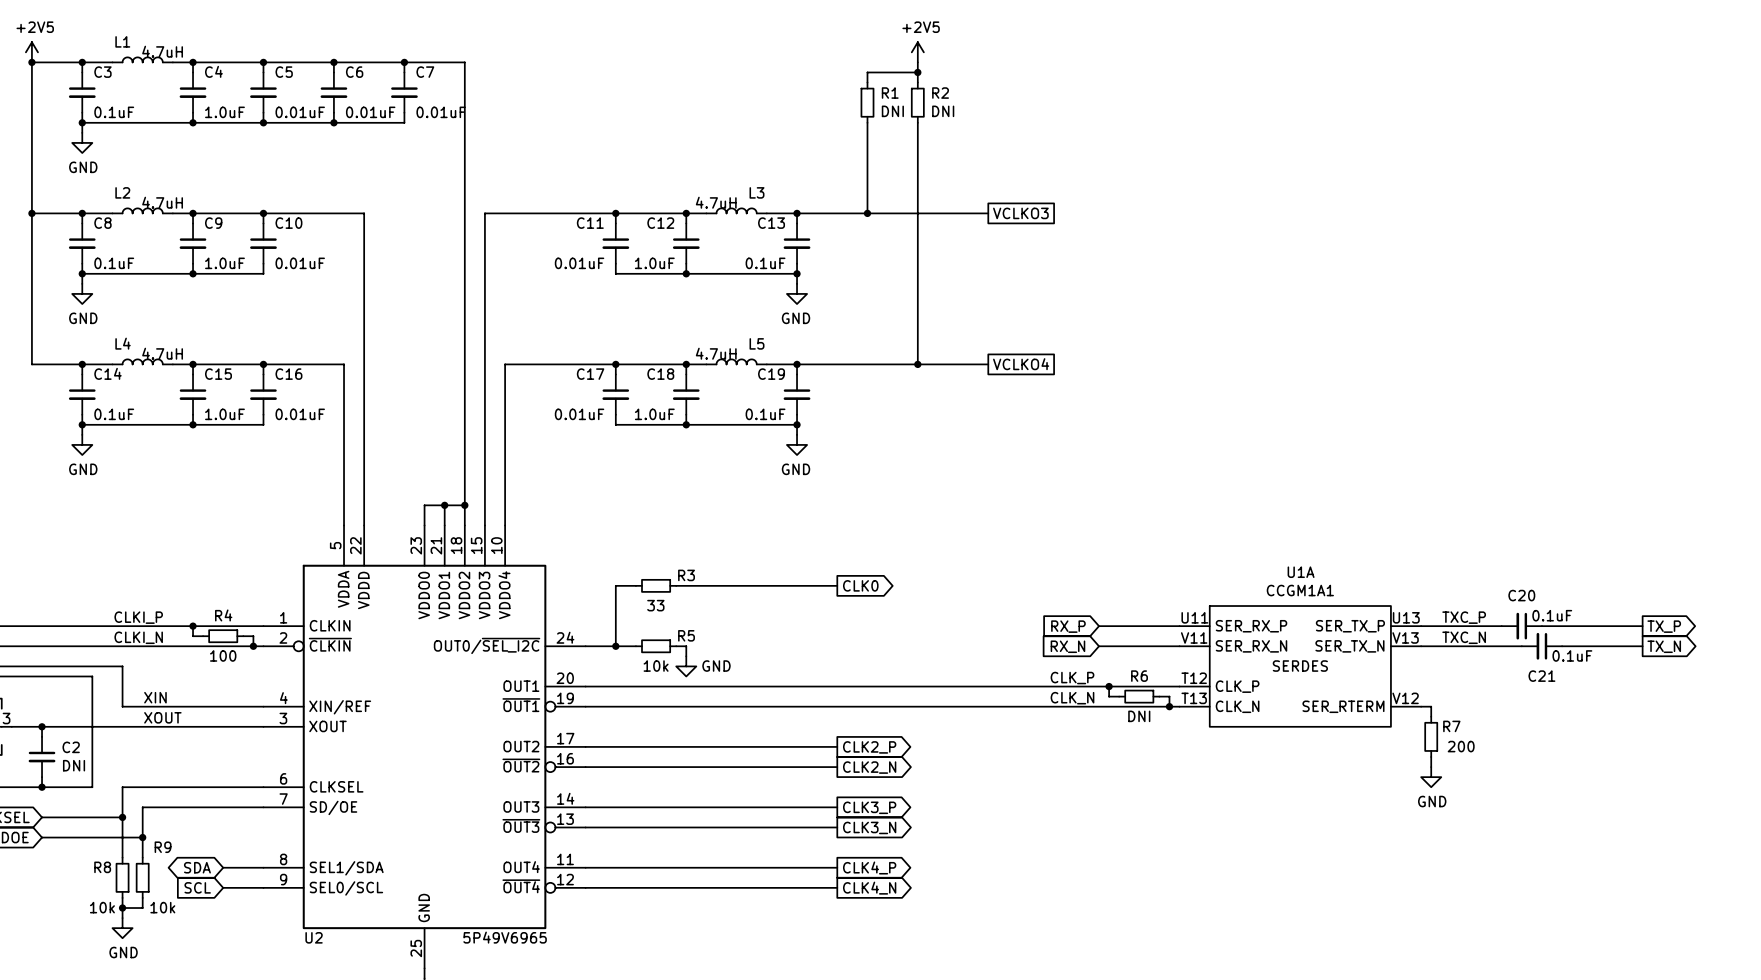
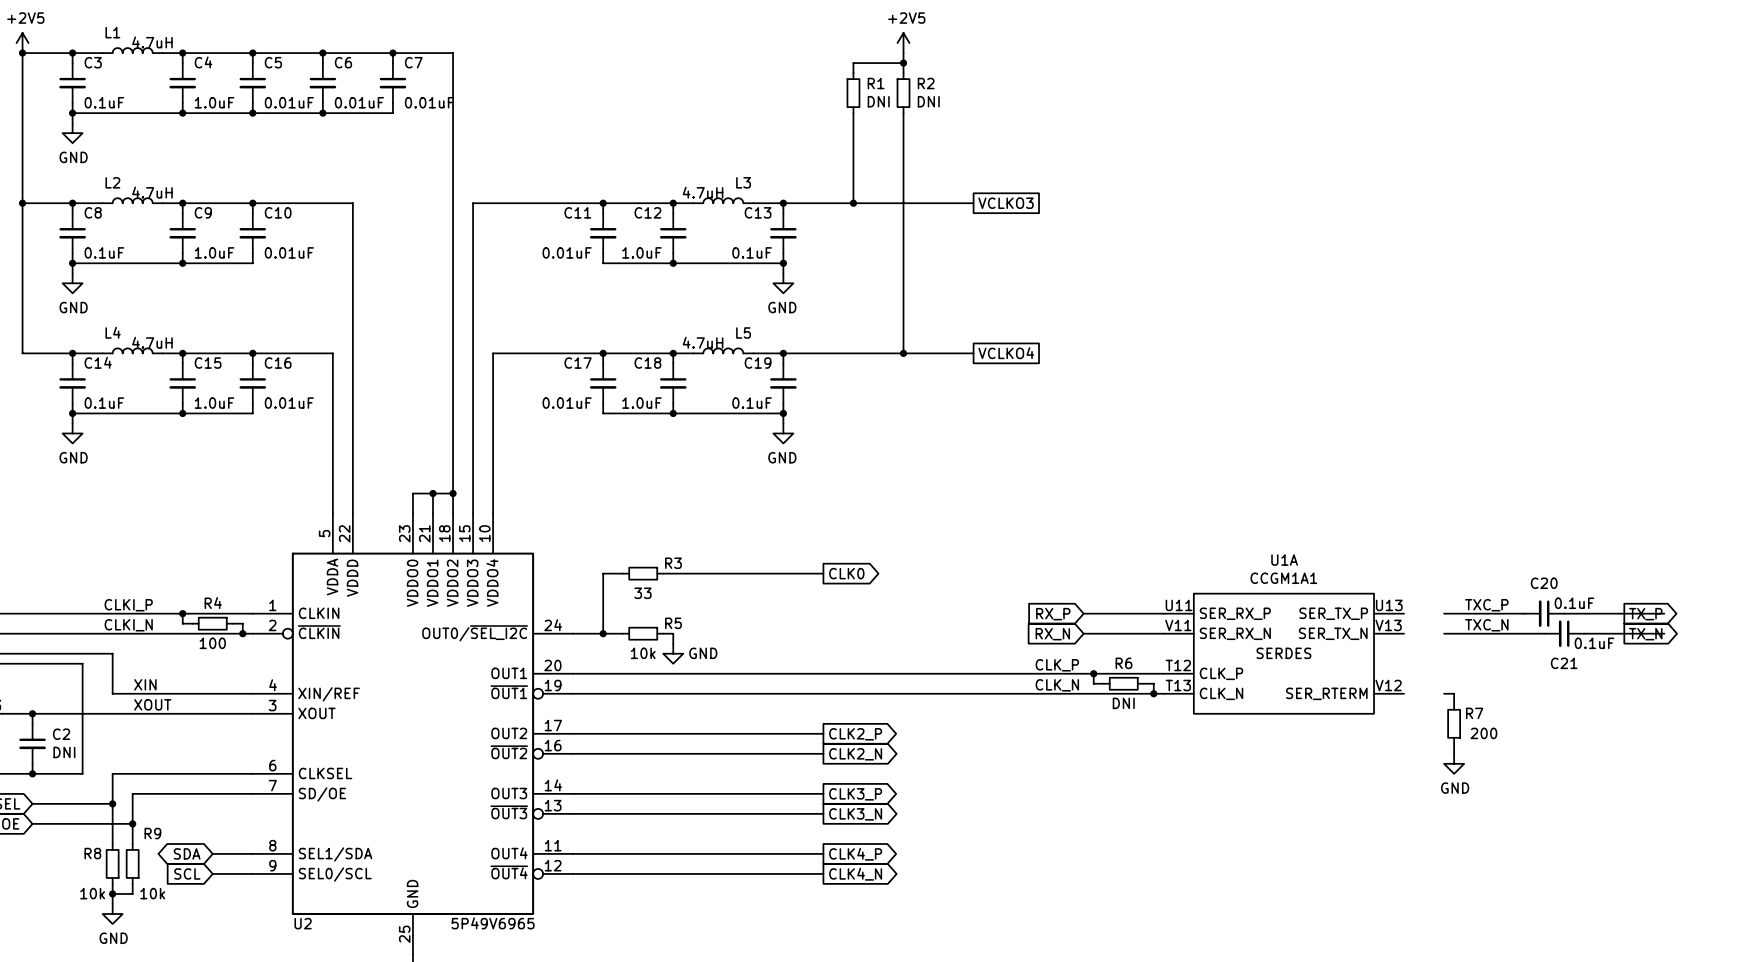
label position: TXC_P (1464, 617) -> TXC_P (1486, 605)
wire: (1421, 626) (1461, 626) -> none
C20 position: (1521, 626) -> (1544, 613)
wire: none -> (1624, 613) (1664, 613)
label position: TXC_N (1464, 637) -> TXC_N (1486, 625)
wire: (1421, 646) (1461, 646) -> none
C21 position: (1541, 646) -> (1564, 633)
wire: none -> (1624, 633) (1664, 633)
wire: (1421, 706) (1431, 706) (1431, 716) -> (1444, 693) (1454, 693) (1454, 703)
R7 position: (1431, 736) -> (1454, 723)
wire: (1431, 757) (1431, 767) -> (1454, 743) (1454, 753)
power symbol position: GND (1431, 777) -> GND (1454, 763)

